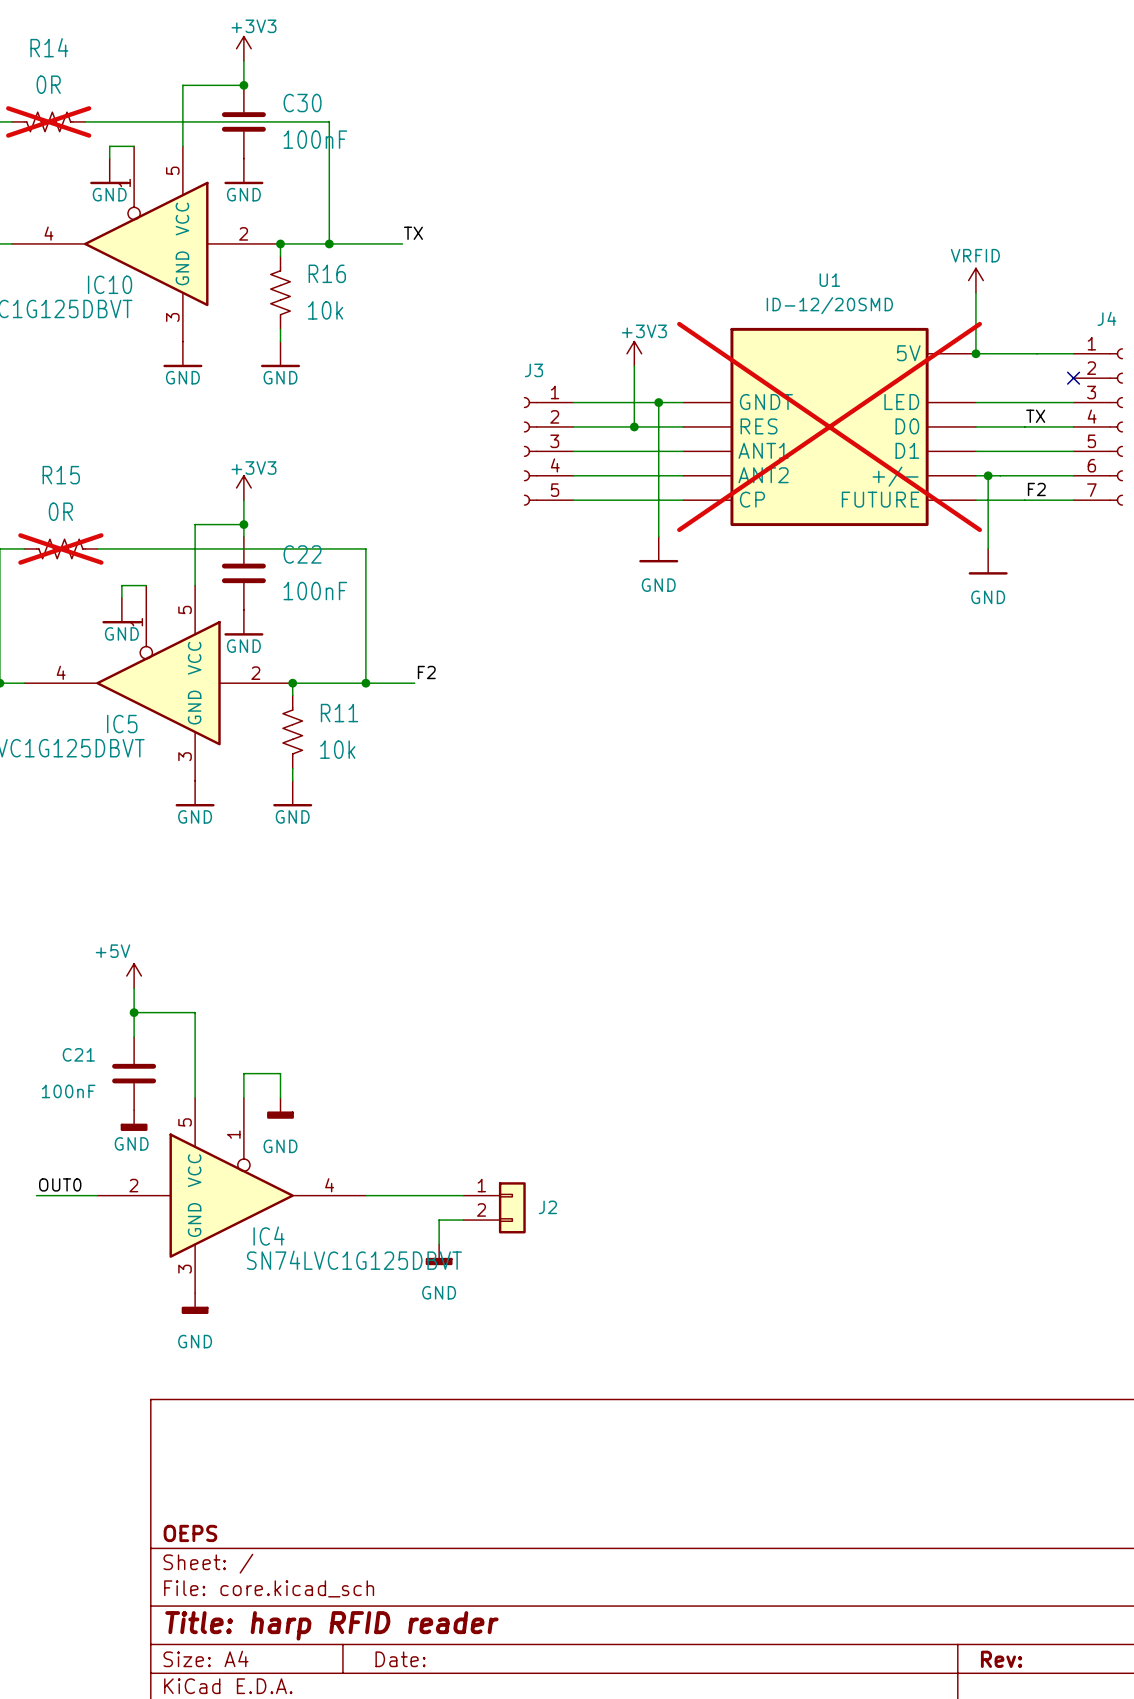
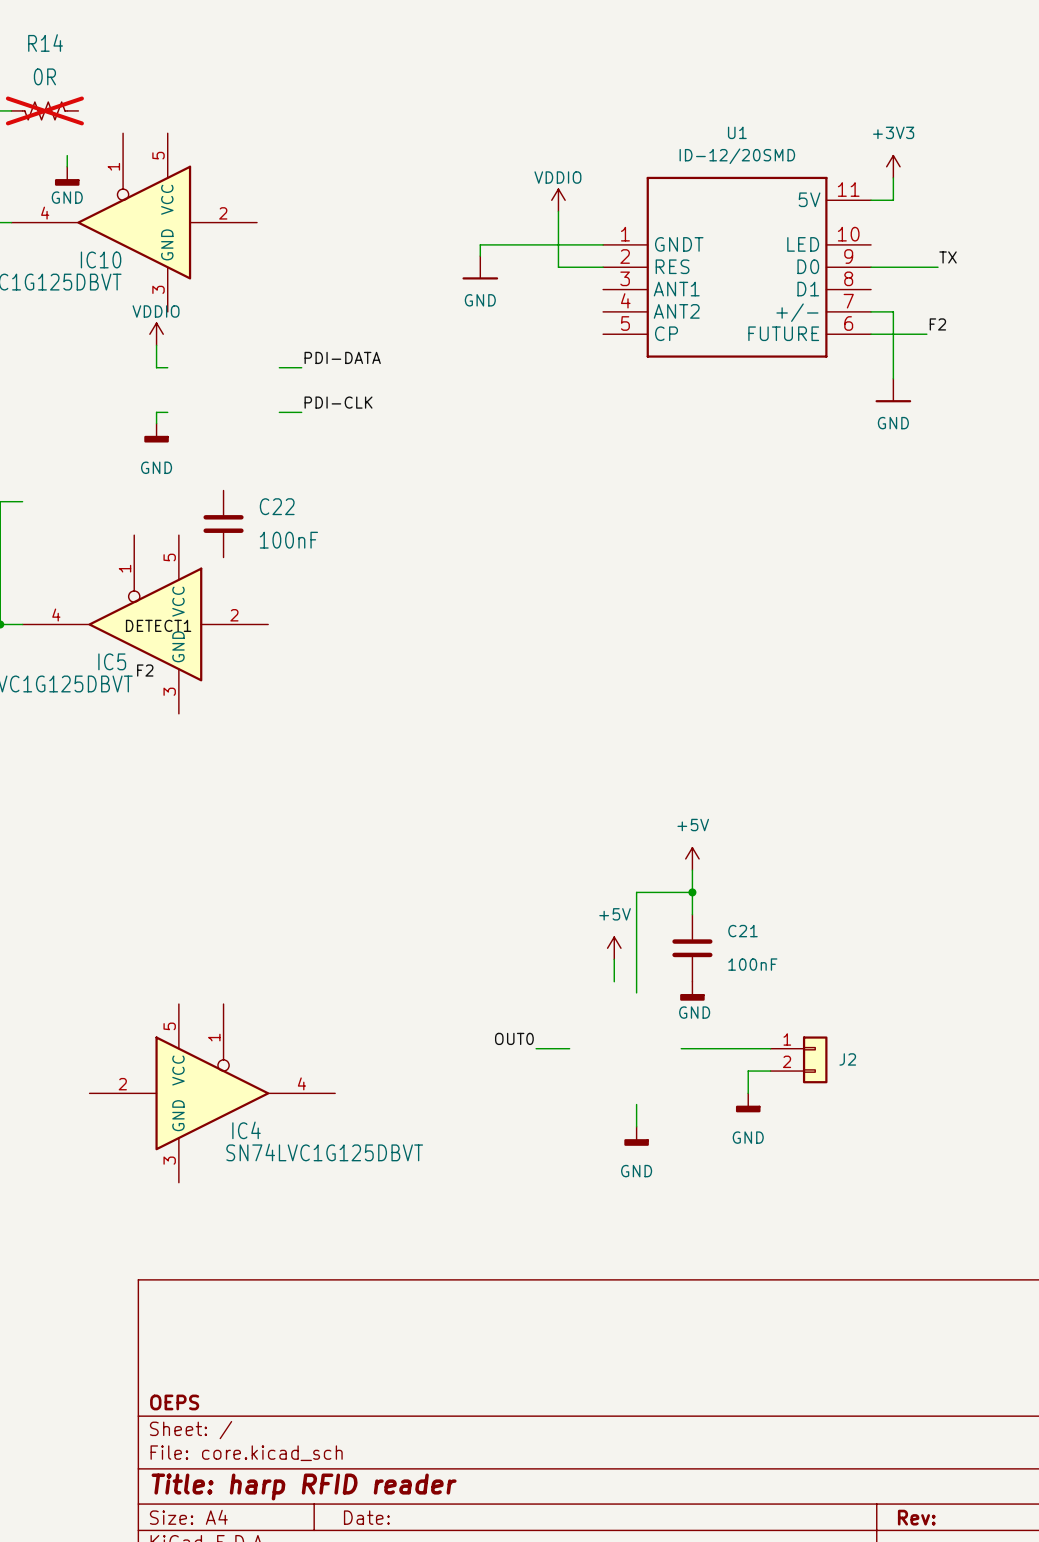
power symbol: +3V3 (243, 48) -> none
wire: (243, 60) (243, 85) (182, 85) (182, 146) -> none
junction: (243, 85) -> none
wire: (85, 121) (329, 121) (329, 243) -> none
C30: 100nF (243, 121) -> none
wire: (134, 146) (109, 146) (109, 158) -> none
wire: none -> (67, 155) (67, 166)
power symbol: GND (109, 171) -> none
power symbol: GND (243, 171) -> none
power symbol: none -> +3V3 (893, 166)
power symbol: none -> GND (67, 176)
wire: none -> (893, 177) (893, 200) (871, 200)
power symbol: none -> VDDIO (558, 200)
wire: none -> (558, 211) (558, 267) (603, 267)
label: TX (413, 233) -> none
junction: (280, 243) -> none
junction: (329, 243) -> none
wire: (402, 243) (280, 243) (280, 256) -> none
wire: none -> (603, 244) (480, 244) (480, 256)
power symbol: VRFID (975, 280) -> none
R16: 10k (280, 292) -> none
wire: none -> (871, 267) (938, 267)
wire: (975, 292) (975, 341) -> (871, 311) (893, 311)
power symbol: none -> GND (480, 267)
U1 symbol: [683, 327, 976, 527] -> [603, 176, 872, 358]
wire: (280, 329) (280, 341) -> none
power symbol: +3V3 (634, 353) -> none
wire: (975, 353) (1073, 353) -> (893, 323) (893, 378)
junction: (975, 353) -> none
power symbol: GND (182, 354) -> none
power symbol: GND (280, 354) -> none
power symbol: none -> VDDIO (156, 334)
wire: (634, 365) (634, 426) -> none
wire: none -> (871, 334) (926, 334)
wire: none -> (156, 345) (156, 367) (167, 367)
no-connect mark: (1073, 378) -> none
label: none -> PDI-DATA (342, 357)
wire: none -> (279, 367) (301, 367)
wire: (573, 402) (683, 402) -> none
wire: (658, 402) (658, 536) -> none
junction: (658, 402) -> none
wire: (975, 402) (1073, 402) -> none
label position: TX (1035, 416) -> TX (948, 257)
wire: (573, 426) (683, 426) -> none
junction: (634, 426) -> none
U1 do-not-place cross: (829, 426) -> none
wire: (975, 426) (1073, 426) -> none
J4: (1098, 426) -> none
label: none -> PDI-CLK (338, 402)
wire: none -> (167, 412) (156, 412) (156, 423)
wire: none -> (279, 412) (301, 412)
J3: (548, 451) -> none
wire: (573, 451) (683, 451) -> none
wire: (975, 451) (1073, 451) -> none
power symbol: none -> GND (156, 433)
wire: (573, 475) (683, 475) -> none
wire: (975, 475) (1073, 475) -> none
wire: (988, 475) (988, 548) -> none
junction: (988, 475) -> none
power symbol: +3V3 (243, 487) -> none
label position: F2 (1036, 489) -> F2 (937, 324)
wire: (243, 500) (243, 536) -> none
wire: (573, 500) (683, 500) -> none
wire: (975, 500) (1073, 500) -> none
wire: (243, 524) (195, 524) (195, 585) -> none
junction: (243, 524) -> none
R15: 0R (60, 548) -> none
wire: (97, 548) (365, 548) (365, 683) -> none
power symbol: GND (658, 549) -> none
power symbol position: GND (988, 561) -> GND (893, 390)
wire: (146, 585) (121, 585) (121, 597) -> none
power symbol: GND (121, 610) -> none
power symbol: GND (243, 622) -> none
label: F2 (426, 672) -> none
junction: (292, 683) -> none
junction: (365, 683) -> none
wire: (414, 683) (292, 683) (292, 695) -> none
label: none -> DETECT1 (158, 625)
R11: 10k (292, 731) -> none
label: none -> F2 (145, 670)
wire: (292, 768) (292, 780) -> none
power symbol: GND (195, 793) -> none
power symbol: GND (292, 793) -> none
power symbol: none -> +5V (692, 858)
wire: none -> (692, 870) (692, 914)
power symbol: +5V (134, 976) -> none
wire: none -> (692, 892) (636, 892) (636, 992)
junction: none -> (692, 892)
wire: (134, 988) (134, 1037) -> none
wire: (134, 1012) (195, 1012) (195, 1098) -> none
junction: (134, 1012) -> none
power symbol: none -> +5V (614, 948)
wire: none -> (614, 959) (614, 981)
C21 name position: C21 (78, 1054) -> C21 (743, 931)
C21 position: (134, 1073) -> (692, 948)
power symbol: none -> GND (692, 991)
C21 value position: 100nF (68, 1091) -> 100nF (752, 964)
wire: (243, 1098) (243, 1073) (280, 1073) (280, 1098) -> none
power symbol: GND (280, 1108) -> none
power symbol: GND (134, 1120) -> none
label: none -> OUT0 (514, 1038)
wire: none -> (536, 1048) (569, 1048)
wire: none -> (681, 1048) (770, 1048)
wire: none -> (770, 1071) (748, 1071) (748, 1093)
label: OUT0 (60, 1184) -> none
wire: (36, 1195) (97, 1195) -> none
wire: (365, 1195) (463, 1195) -> none
power symbol: none -> GND (748, 1102)
J2 position: (494, 1207) -> (799, 1059)
wire: none -> (636, 1104) (636, 1126)
wire: (463, 1220) (439, 1220) (439, 1244) -> none
power symbol: none -> GND (636, 1136)
power symbol: GND (439, 1254) -> none
power symbol: GND (195, 1303) -> none

